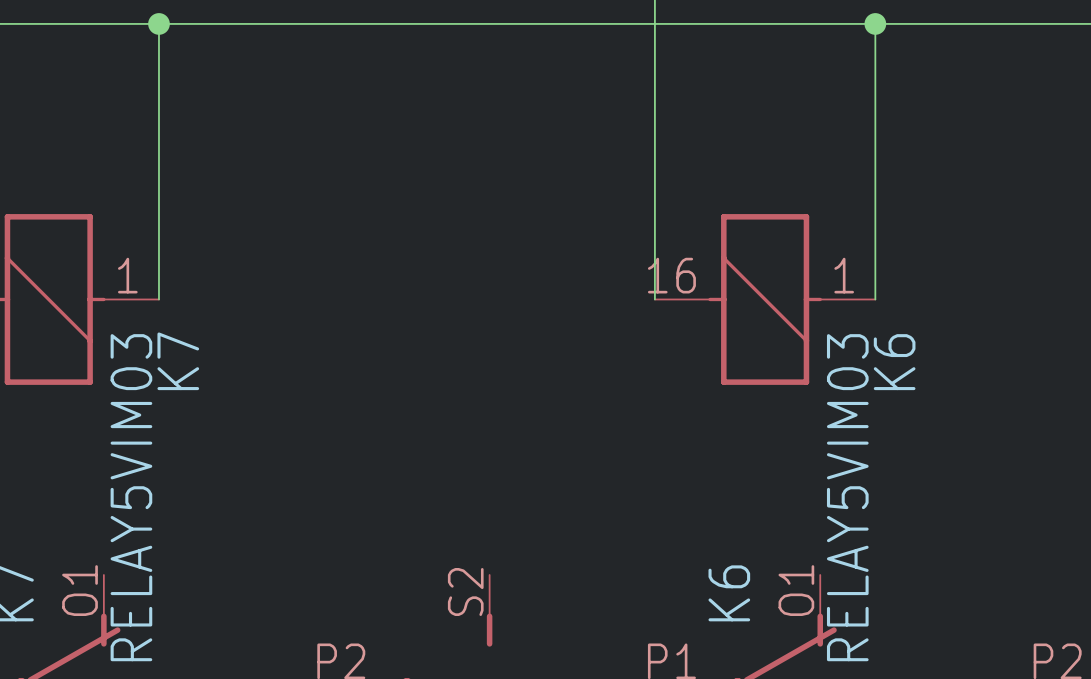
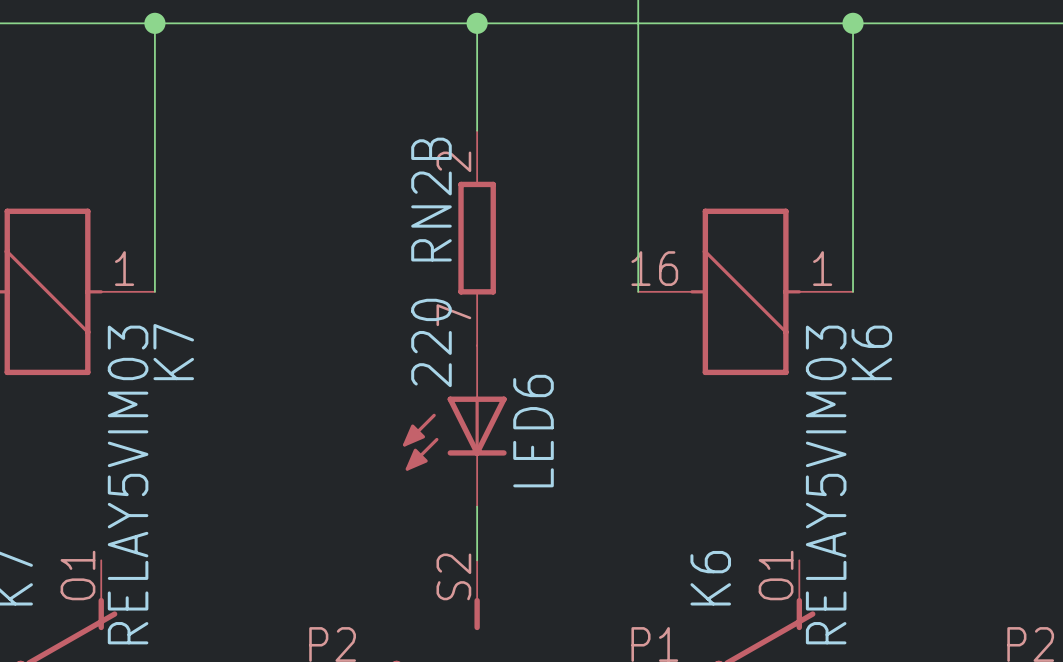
wire: none -> (477, 23) (477, 130)
junction: none -> (477, 23)
RN2B: none -> 220 (477, 238)
LED6: none -> (454, 426)
wire: none -> (477, 506) (477, 560)

